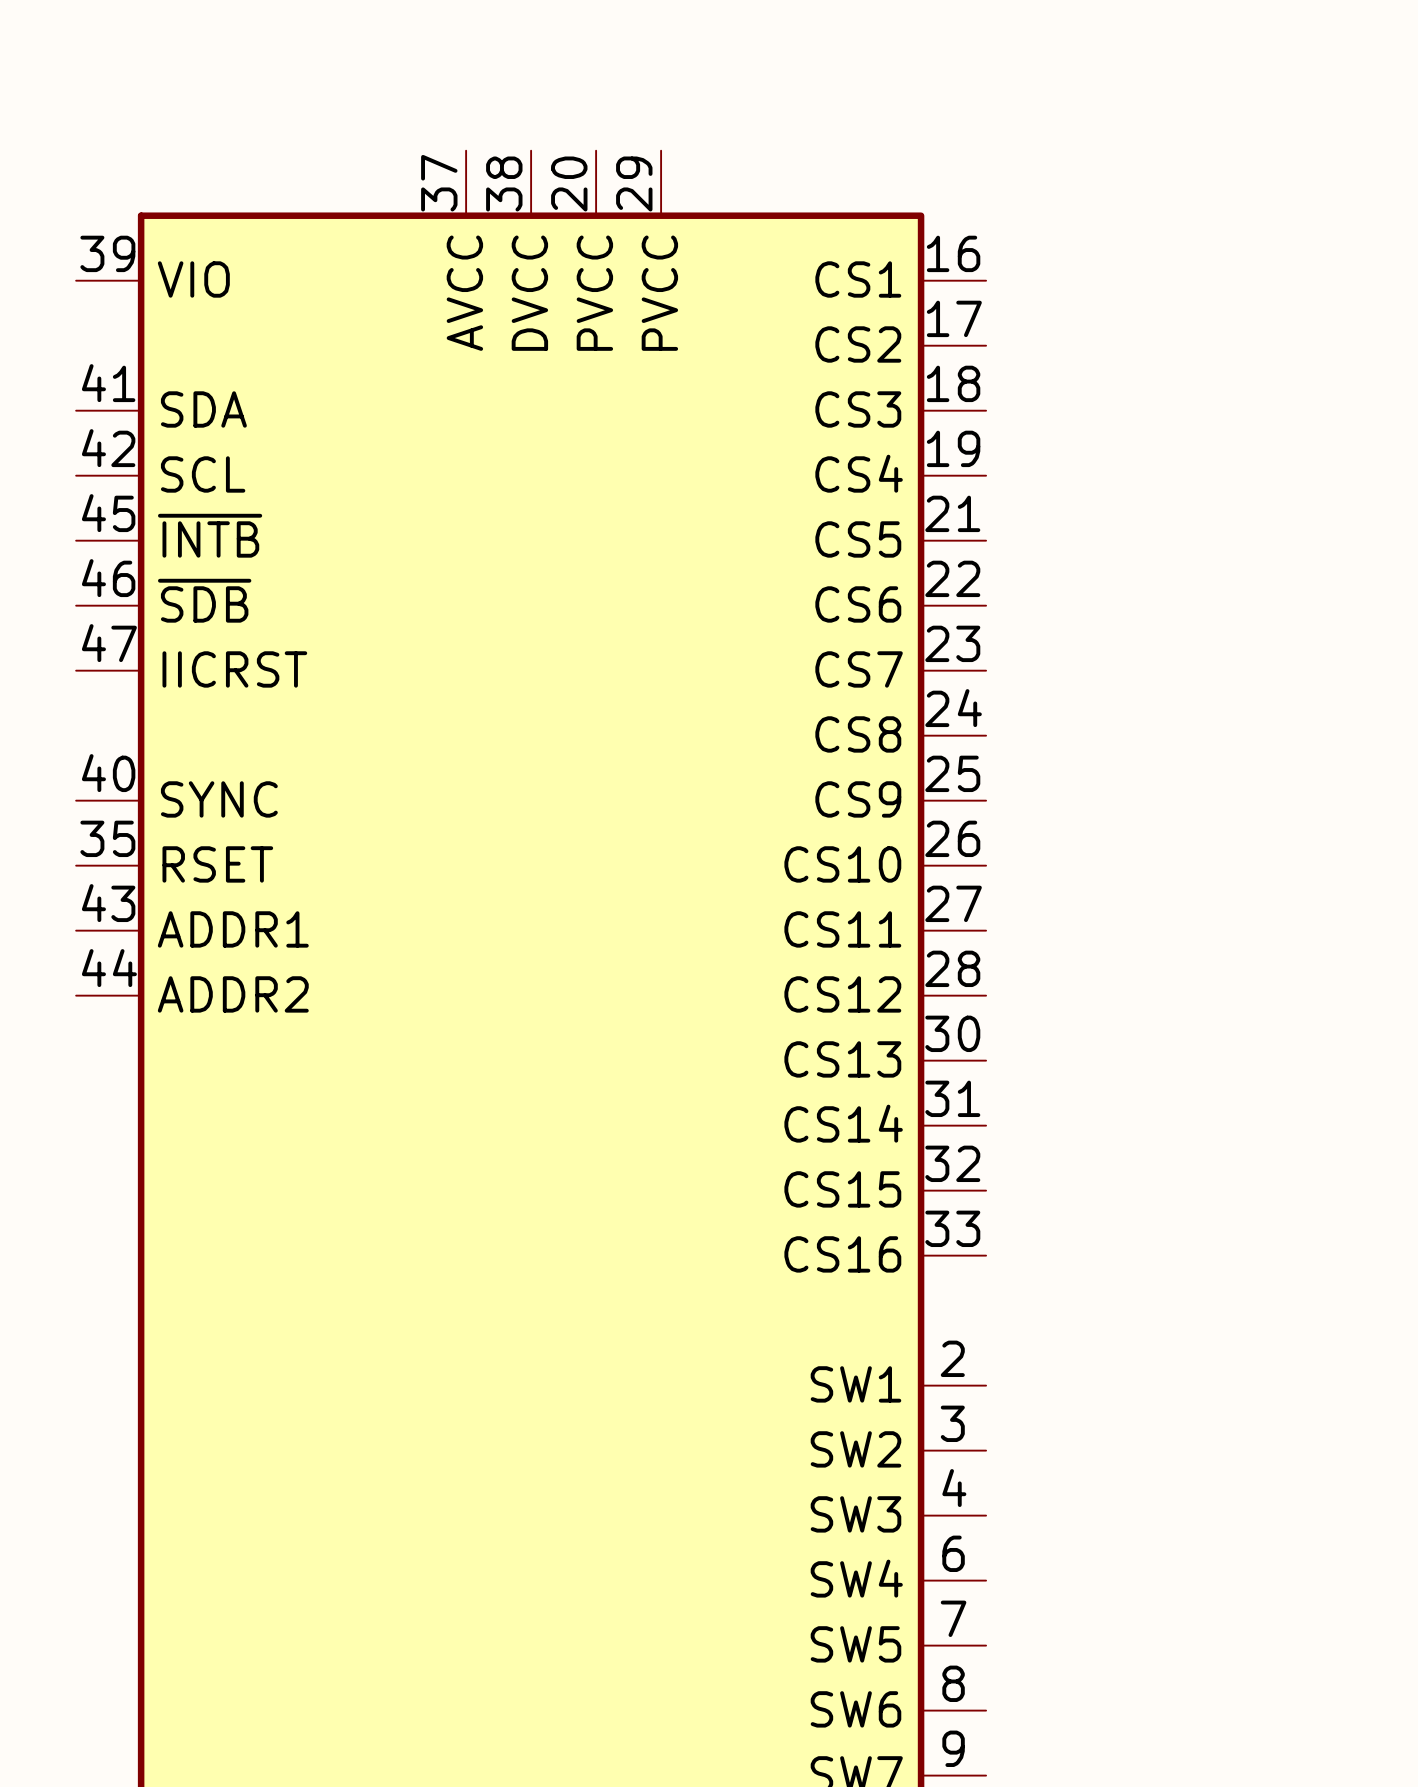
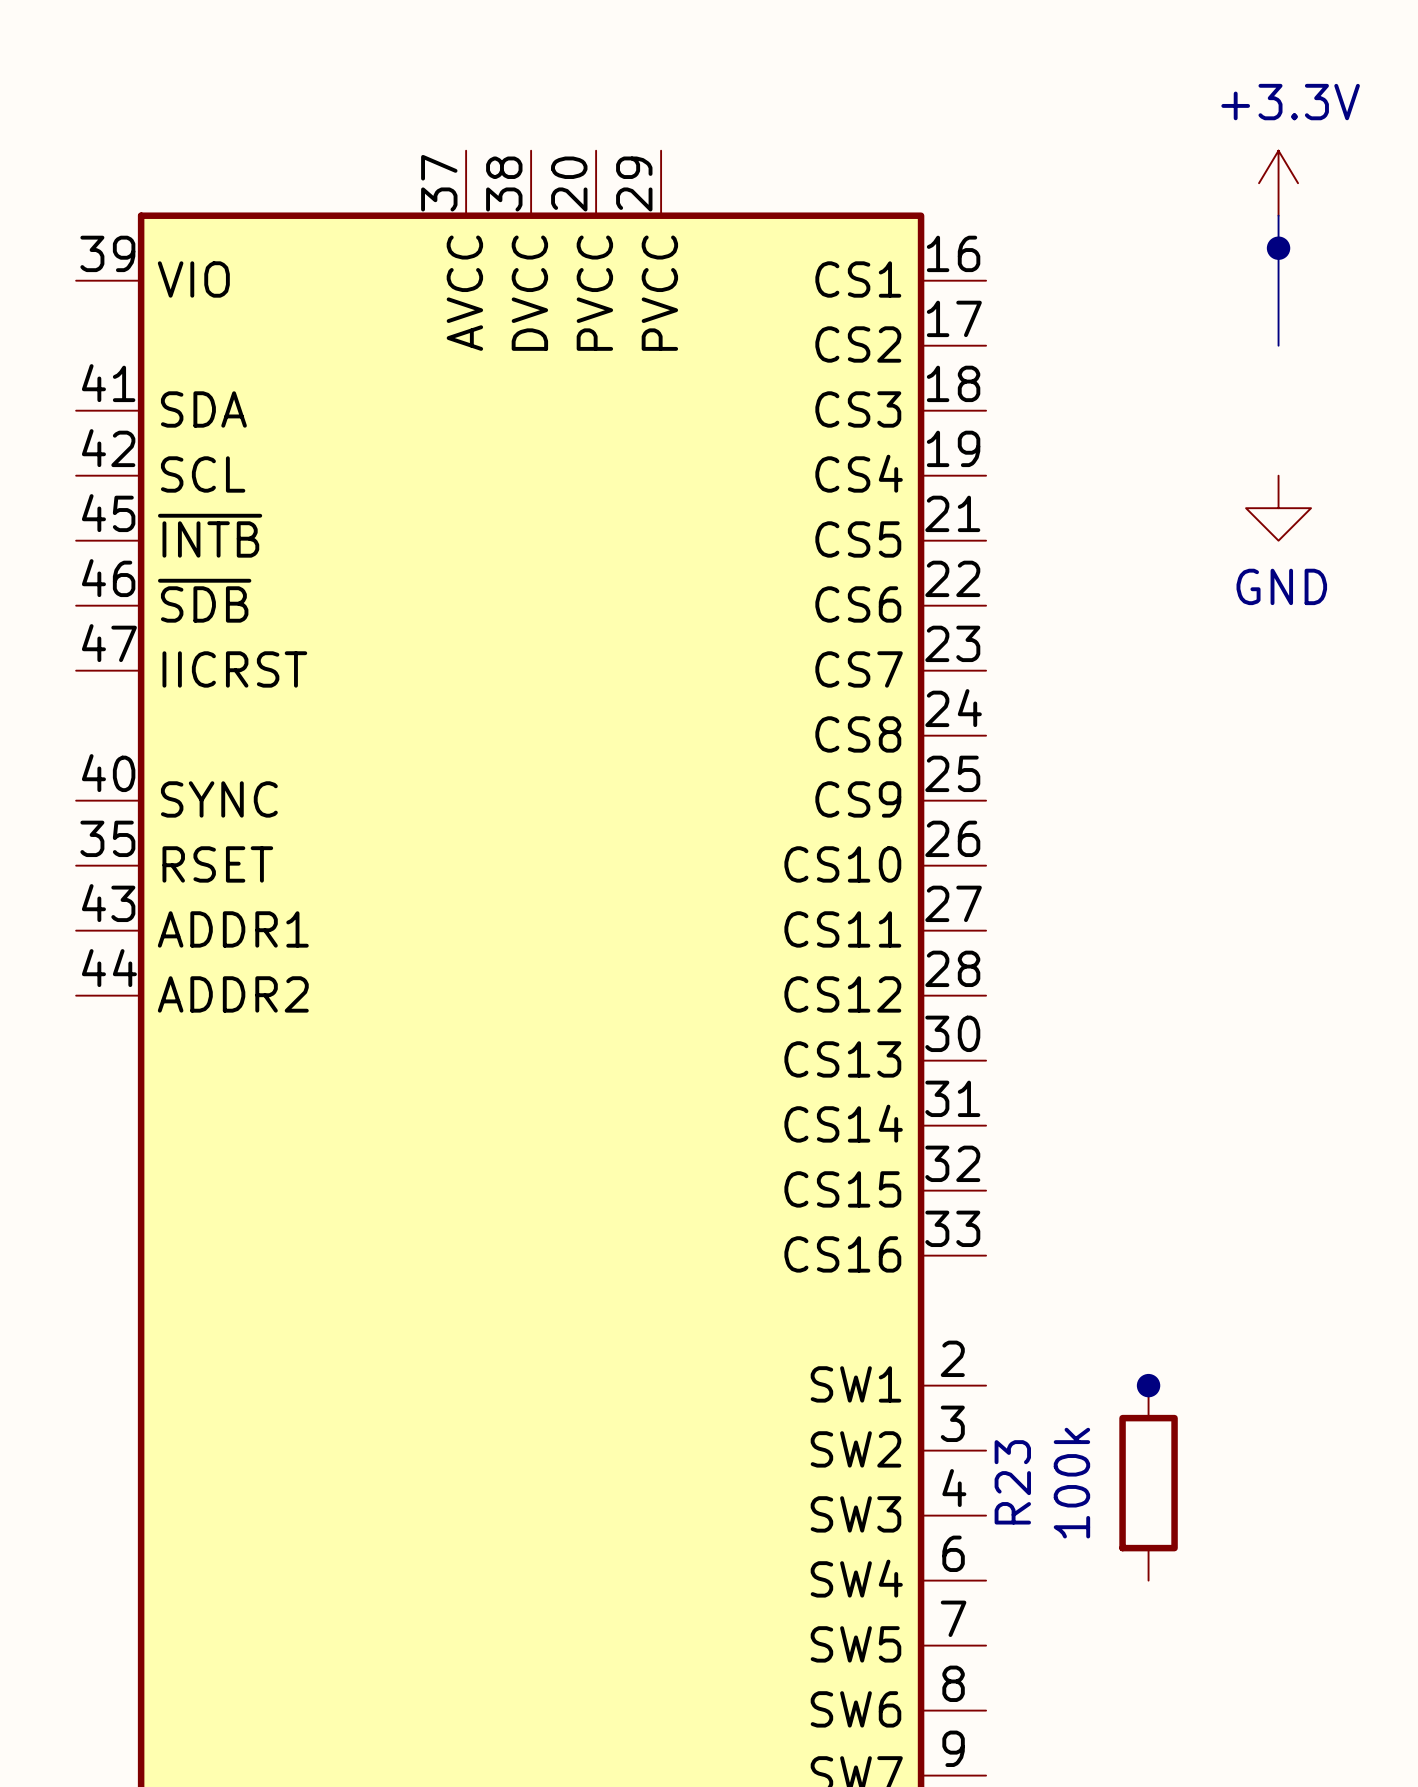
power symbol: none -> +3.3V (1278, 183)
wire: none -> (1278, 215) (1278, 345)
junction: none -> (1278, 248)
power symbol: none -> GND (1278, 508)
junction: none -> (1148, 1385)
R23: none -> 100k (1148, 1483)

